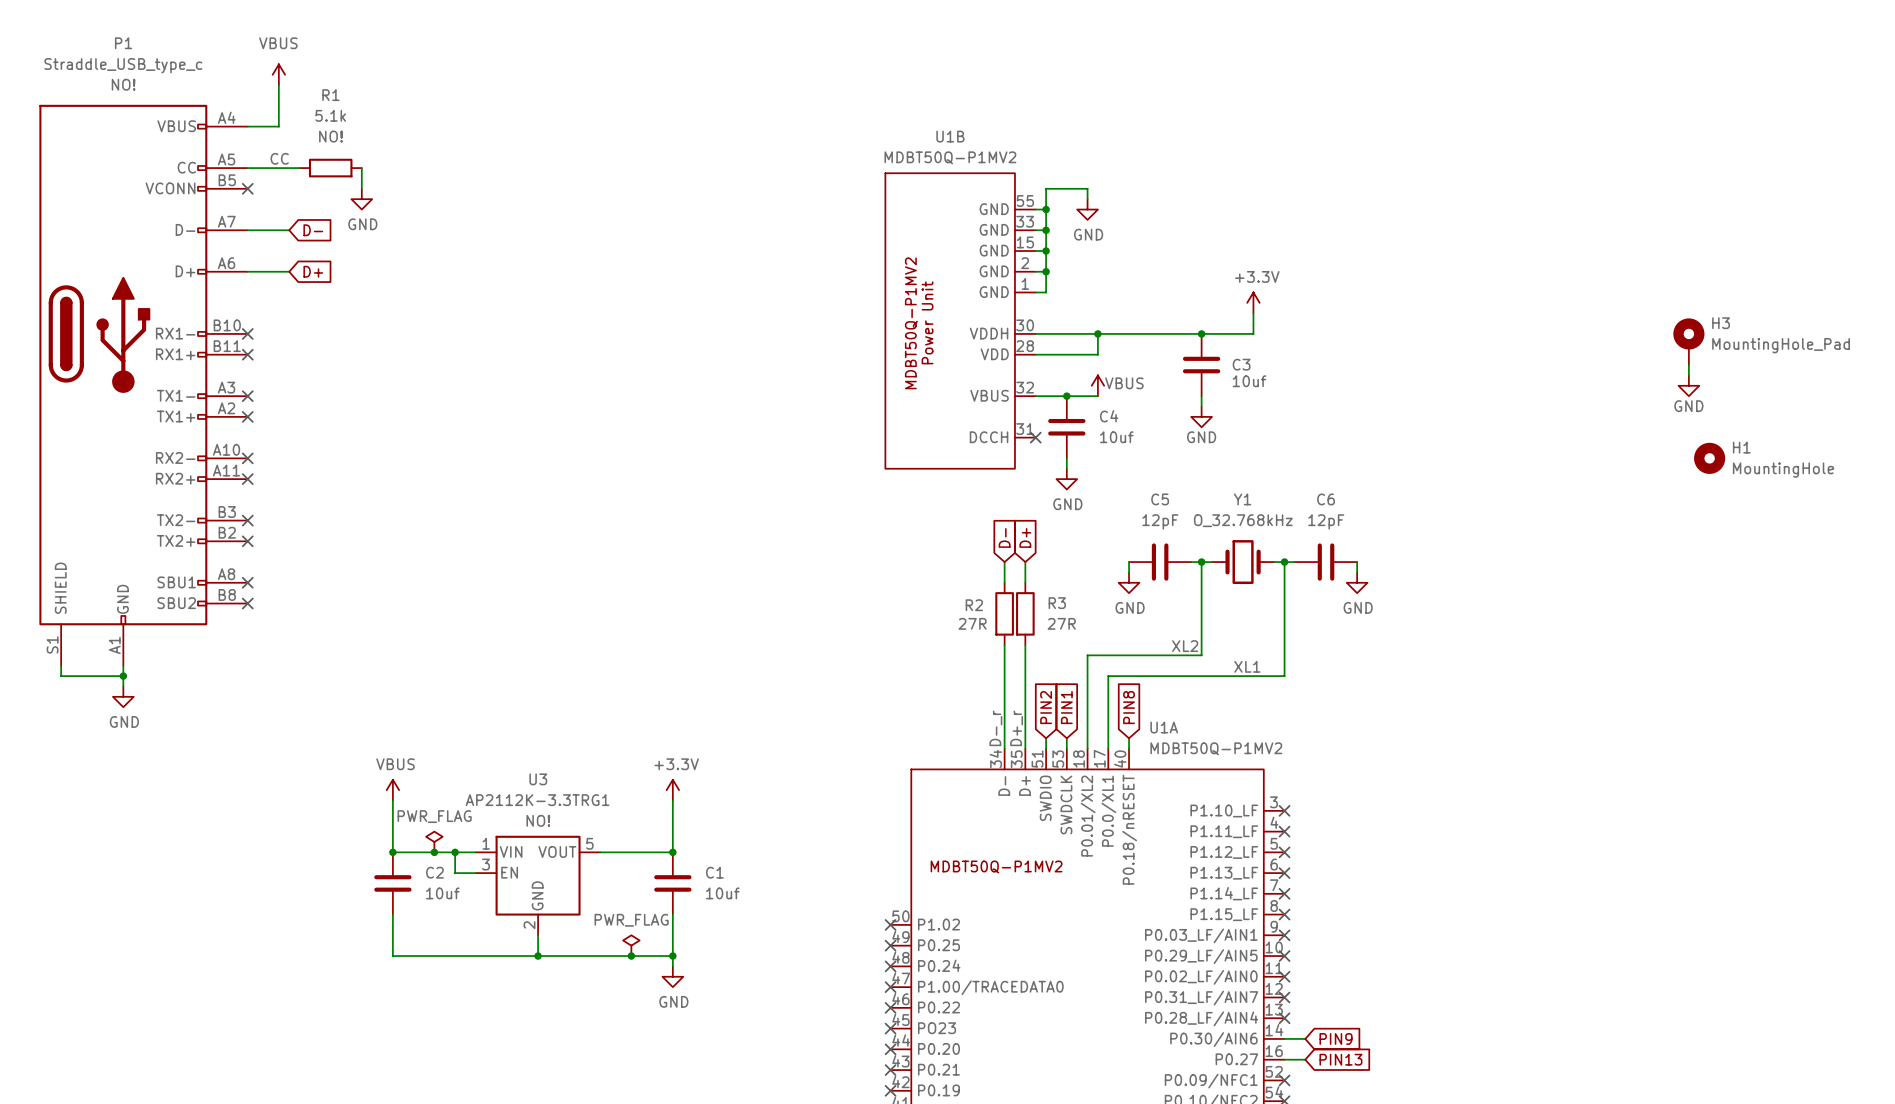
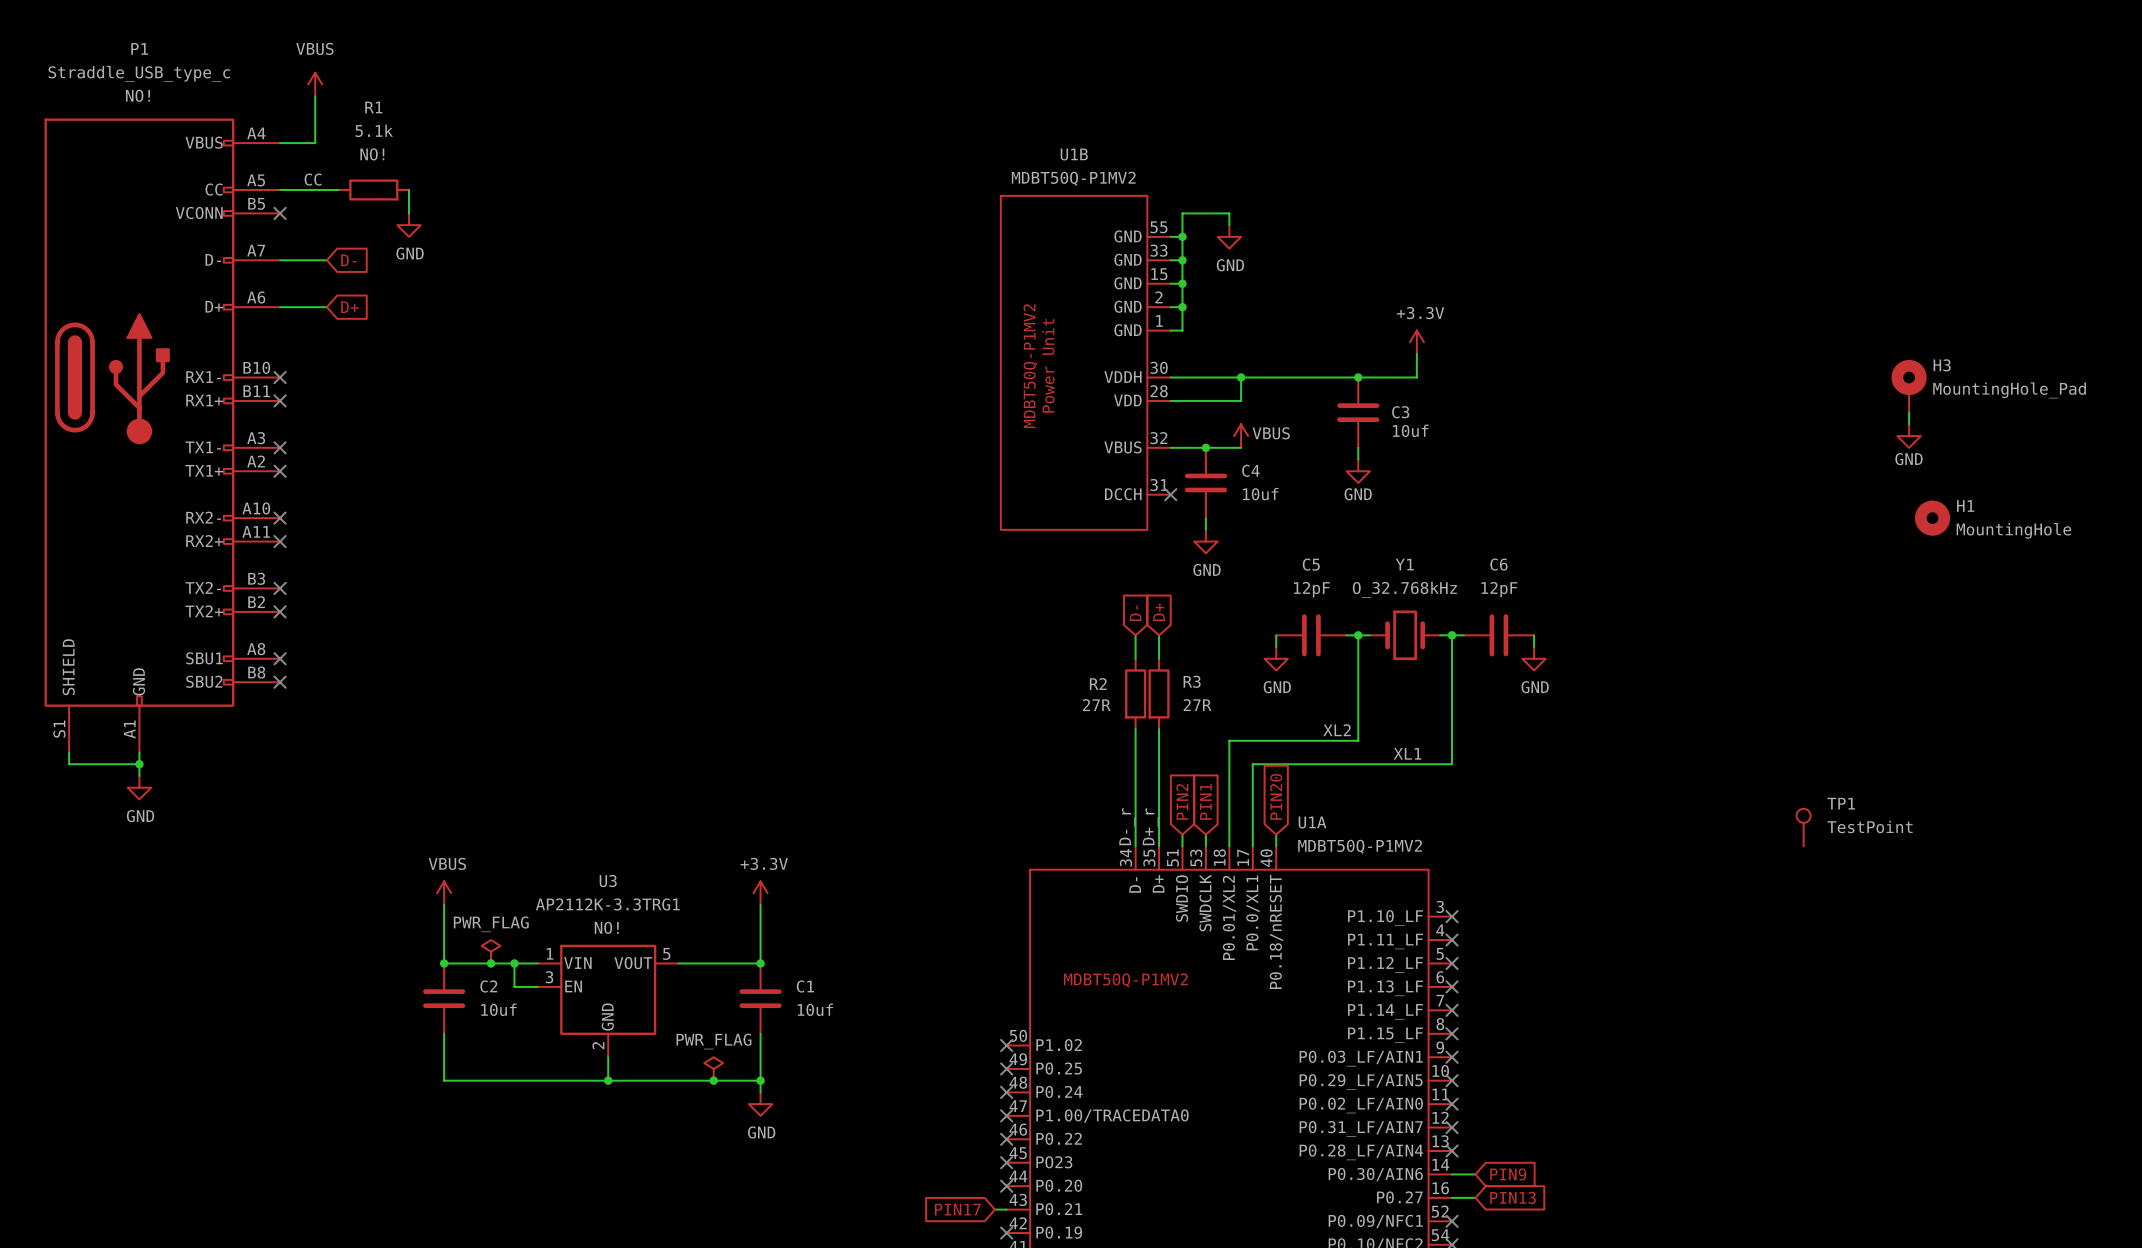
global label: PIN8 (1129, 707) -> PIN20 (1276, 796)
TP1: none -> TestPoint (1803, 827)
global label: none -> PIN17 (957, 1209)
wire: none -> (994, 1209) (1006, 1209)
no-connect mark: (890, 1070) -> none

